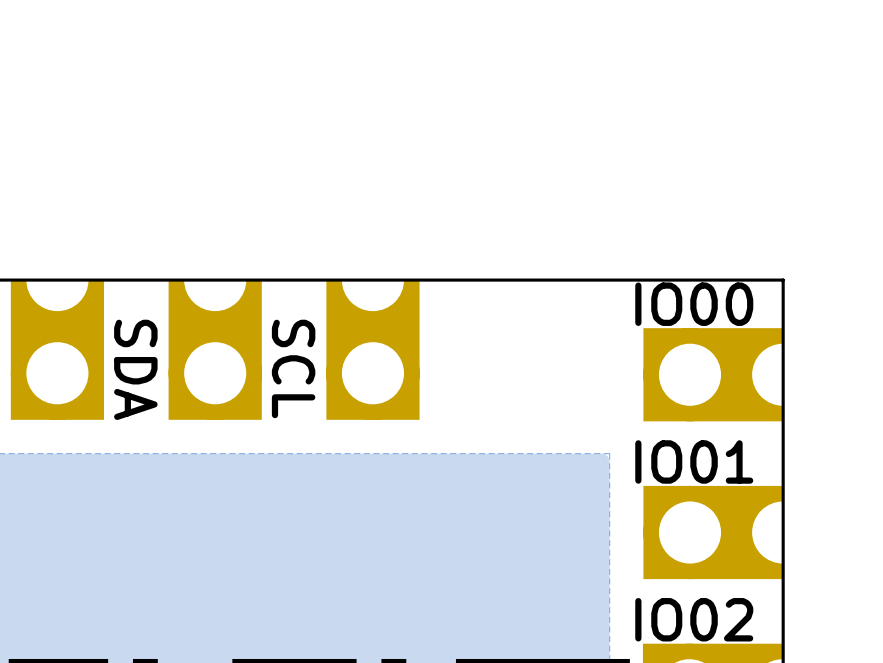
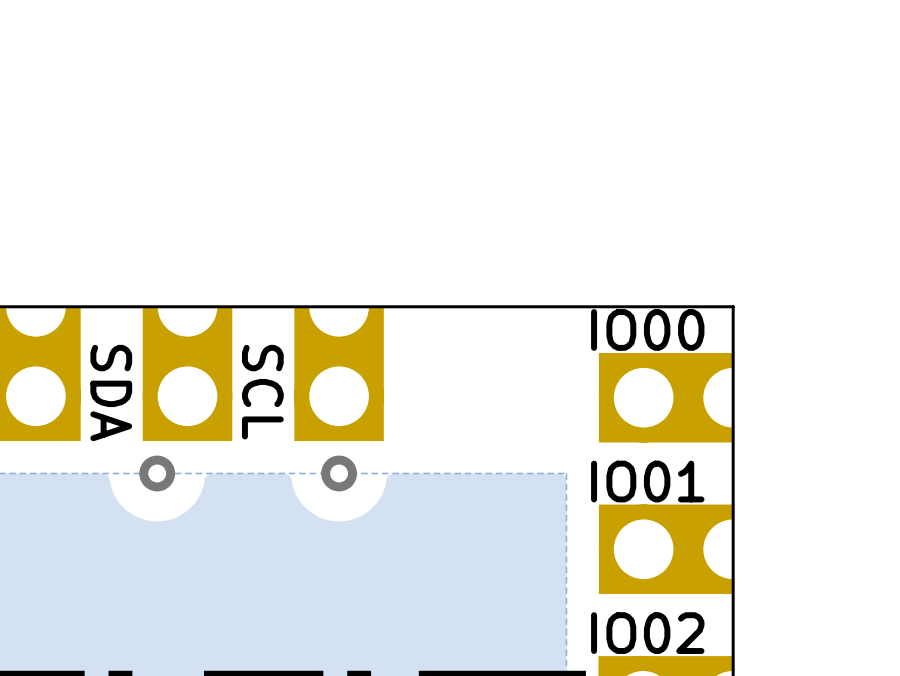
via: none -> (157, 473)
via: none -> (339, 473)

